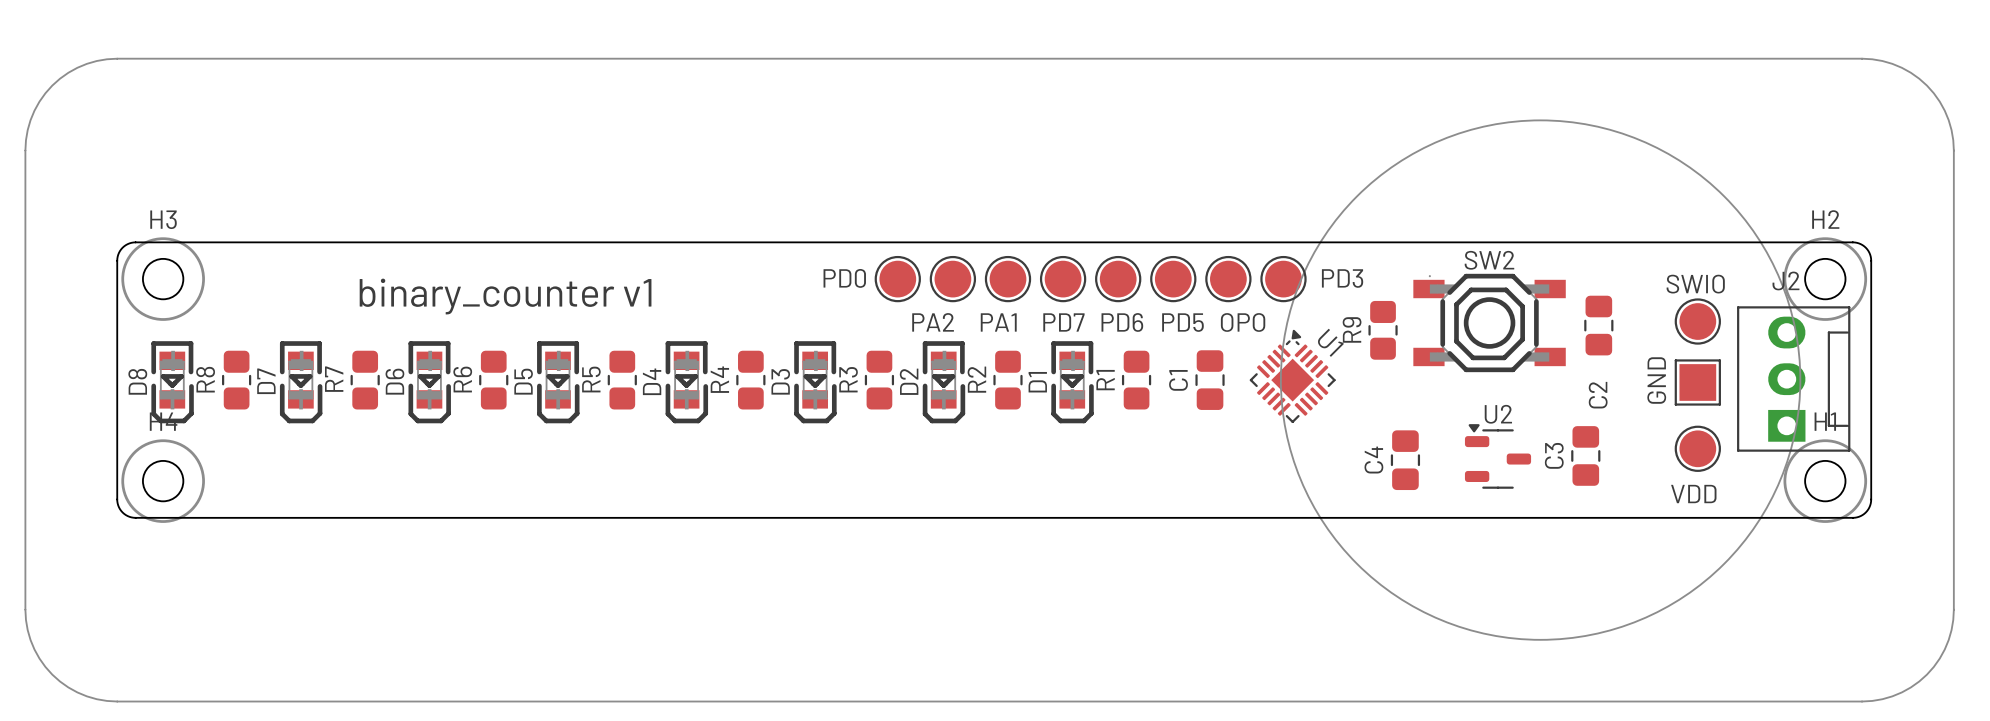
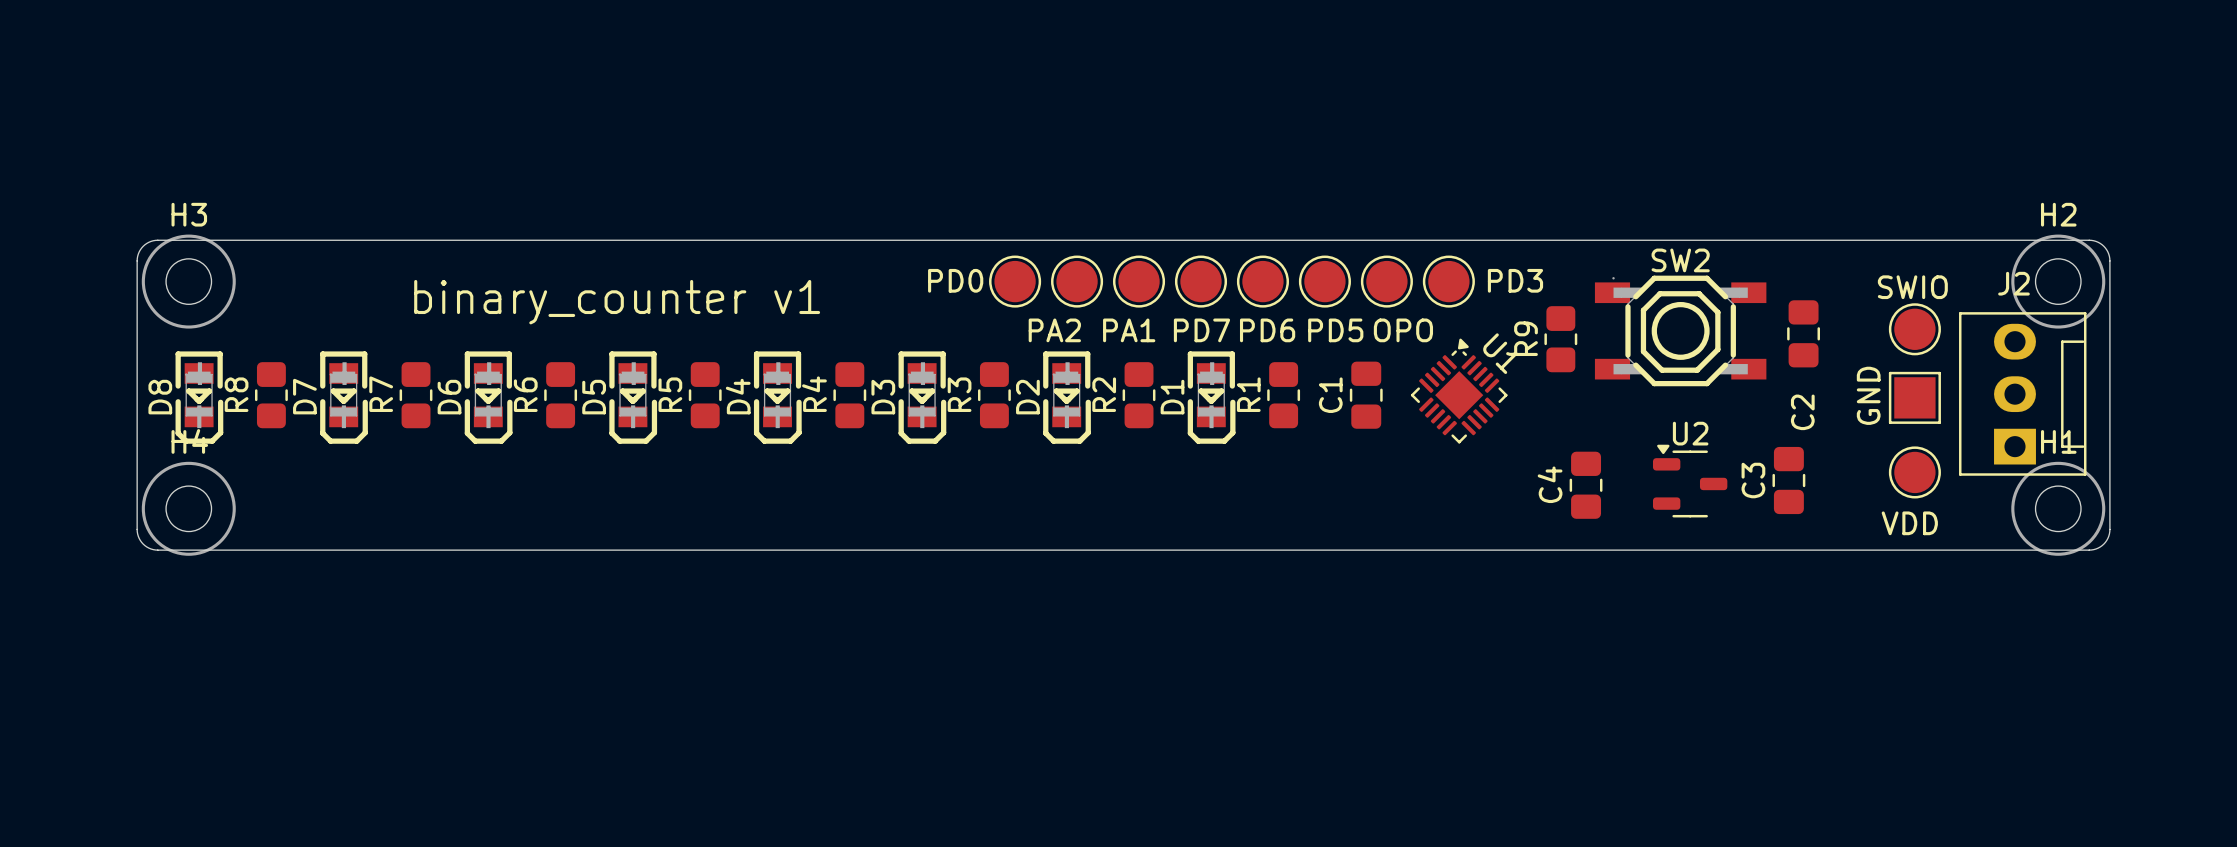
line: (117, 58) (1862, 58) (1892, 63) (1919, 78) (1933, 93) (1944, 110) (1953, 140) (1953, 609) (1948, 640) (1933, 666) (1919, 681) (1892, 696) (1862, 701) (117, 701) (86, 696) (68, 687) (45, 666) (30, 640) (25, 619) (25, 150) (27, 130) (34, 110) (52, 85) (77, 67) (96, 61) (117, 58) -> none
drawing: [1279, 119, 1802, 641] -> none

